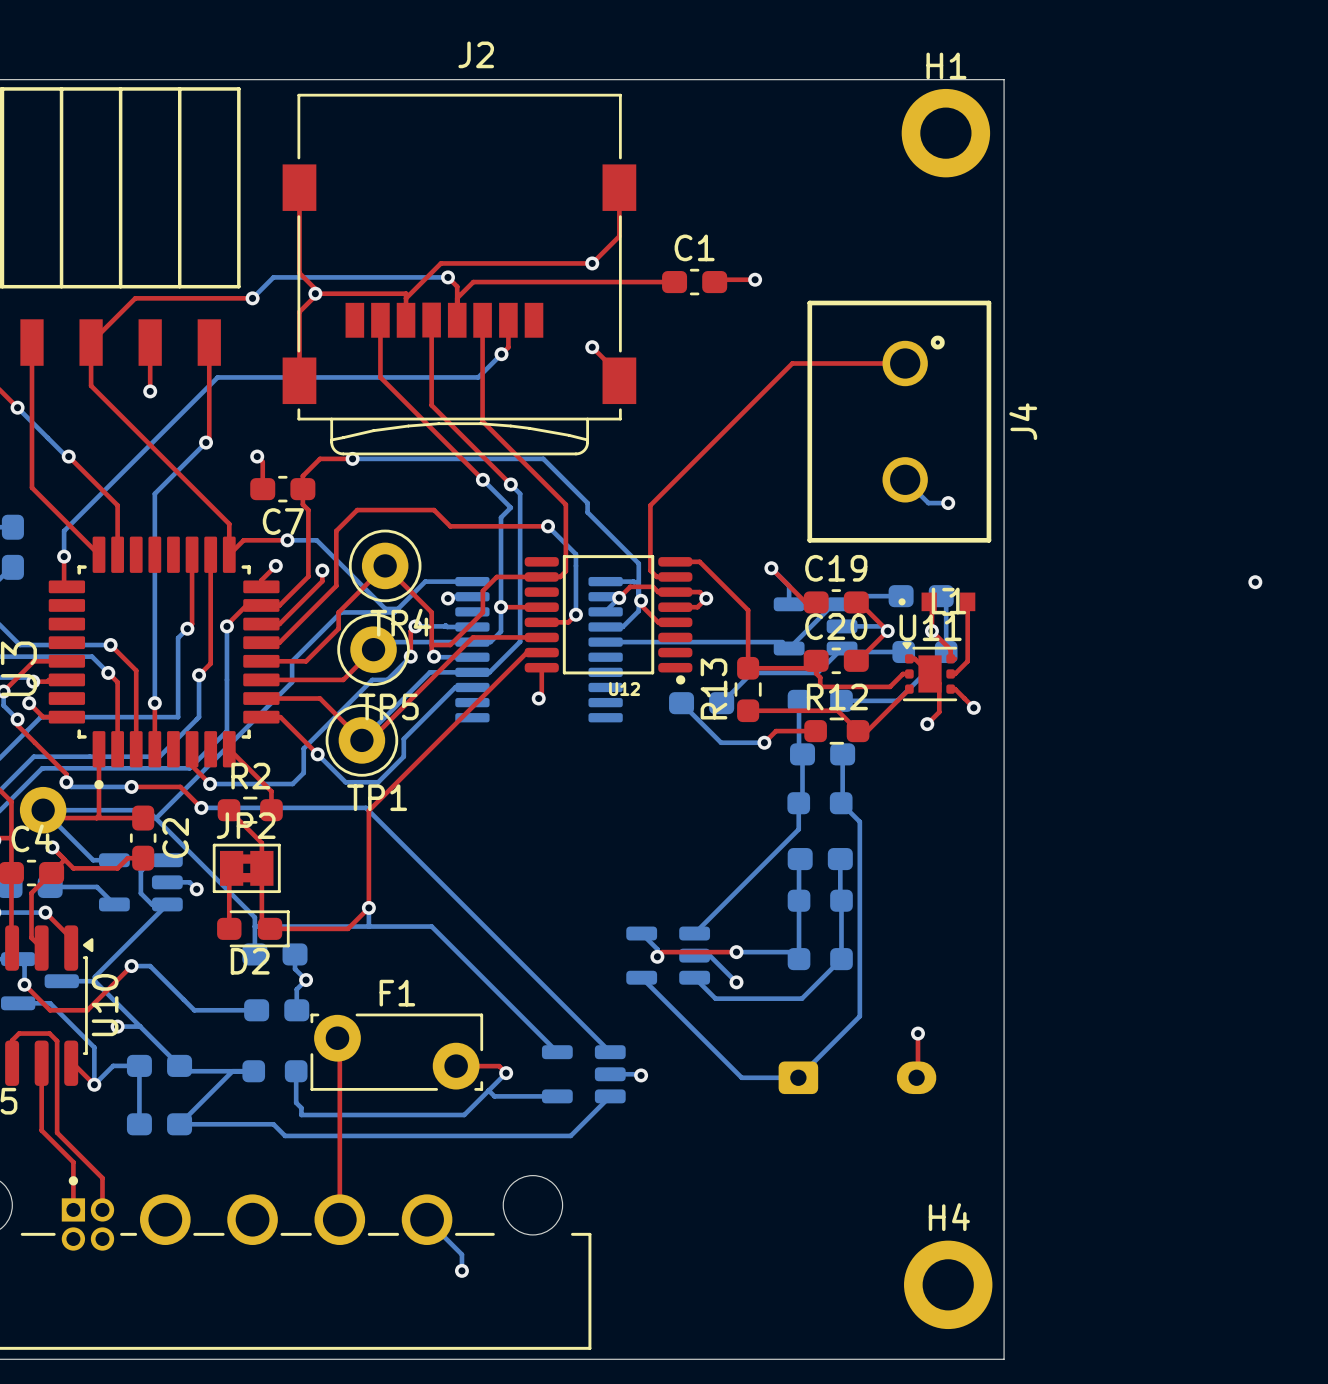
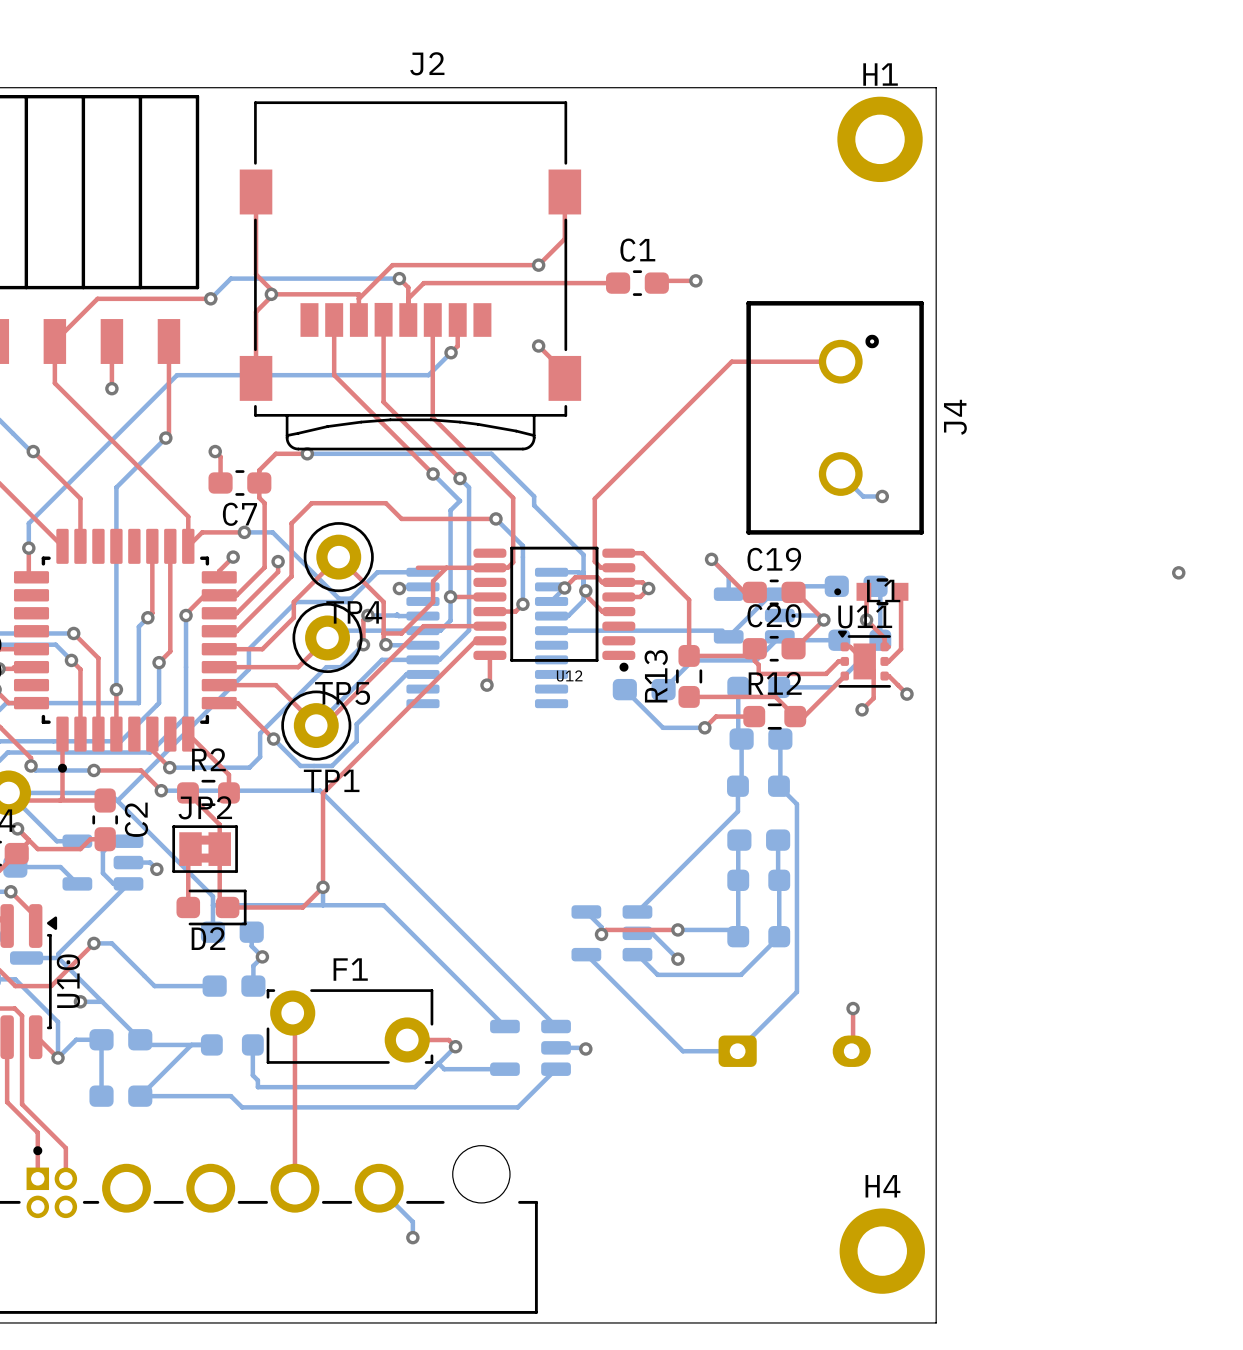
top track: none -> (417, 567) (446, 567)

